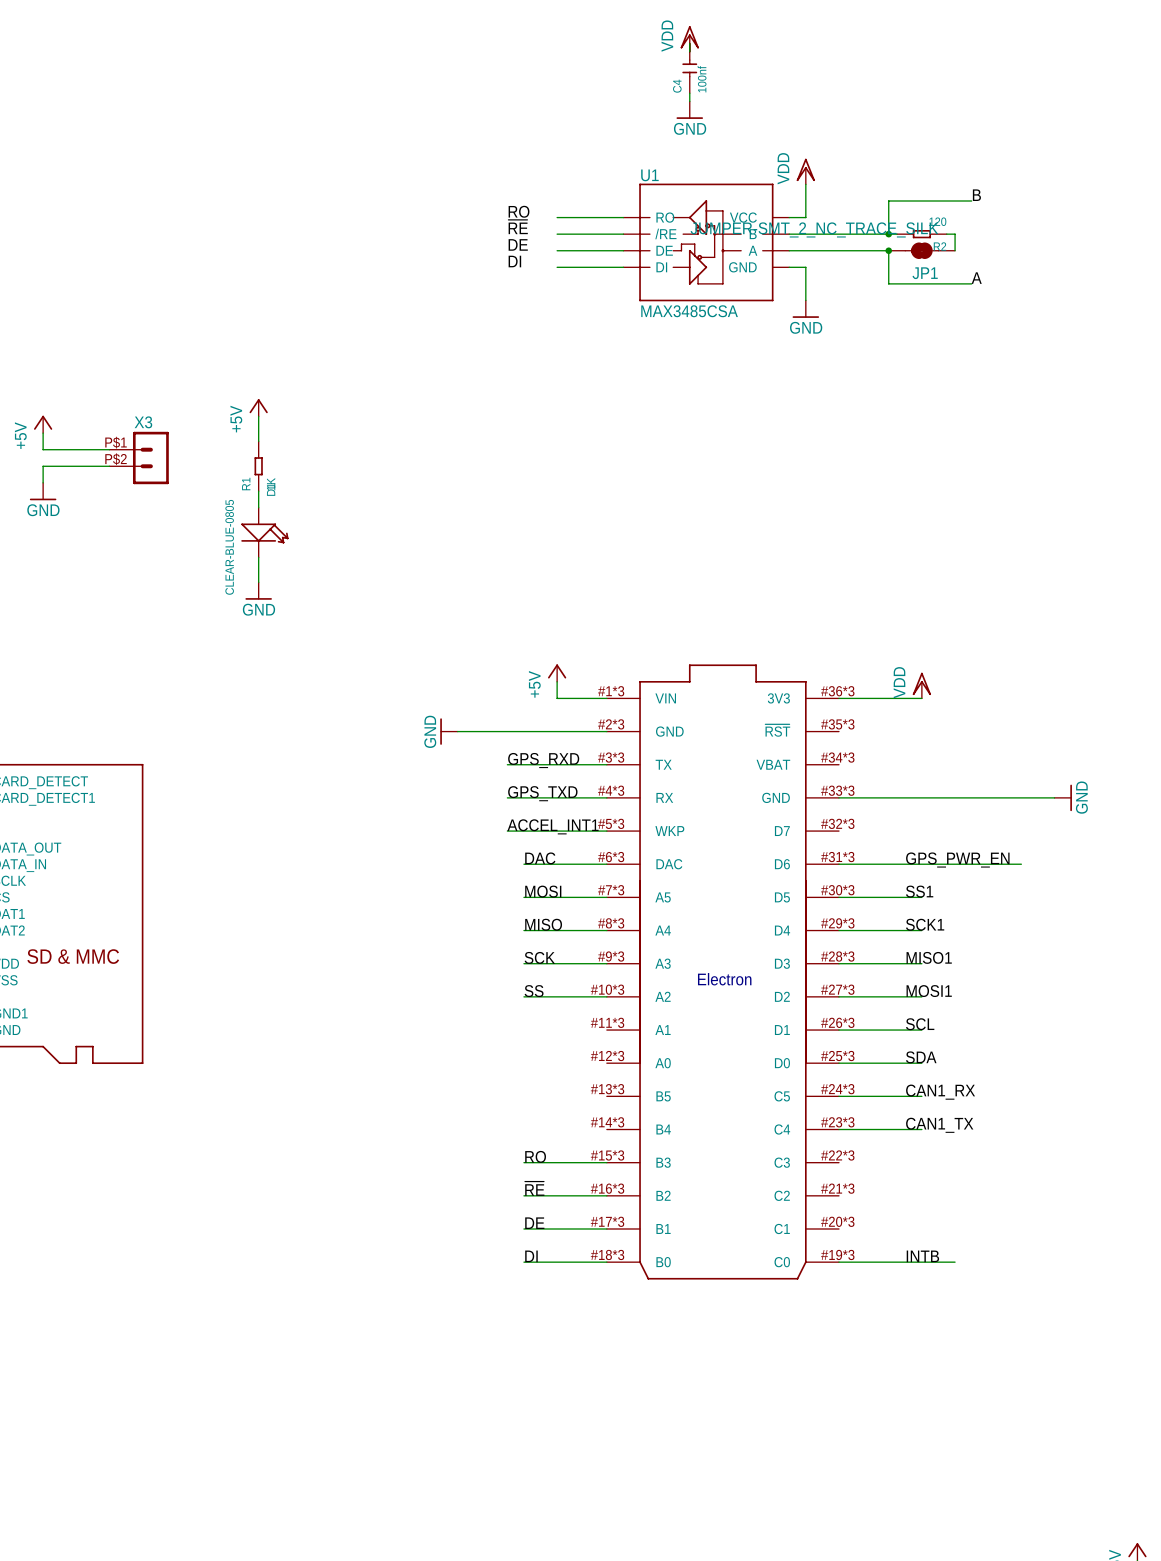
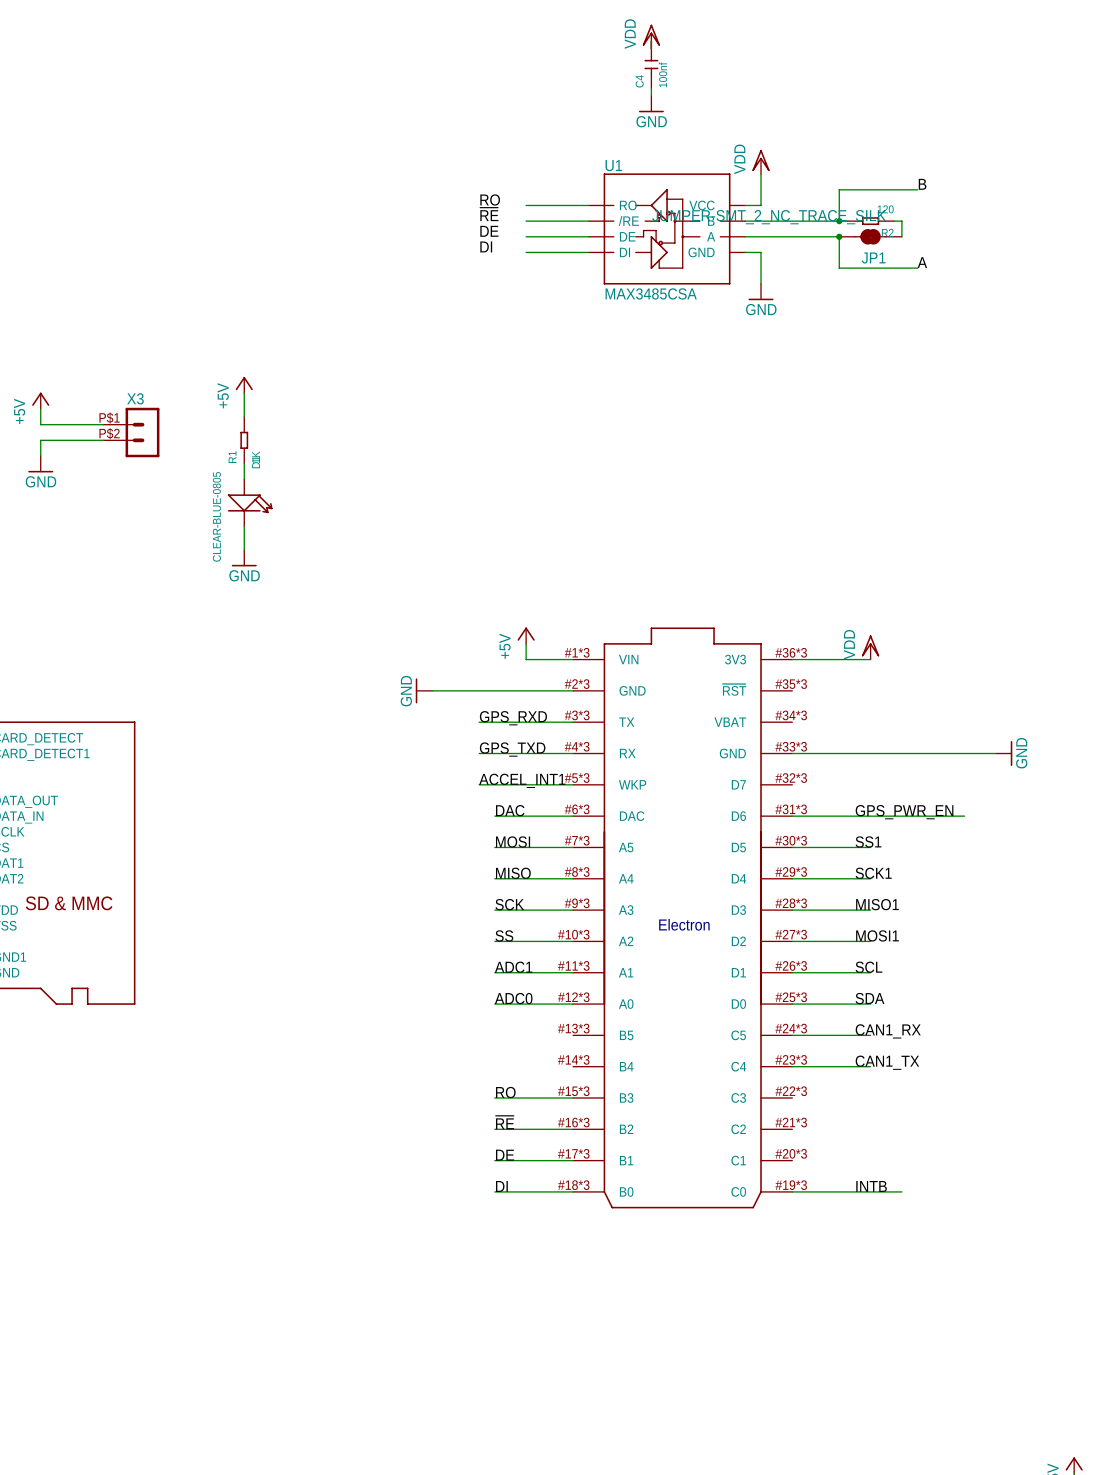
label: none -> ADC1 (513, 967)
wire: none -> (494, 972) (573, 972)
label: none -> ADC0 (513, 998)
wire: none -> (494, 1004) (573, 1004)

